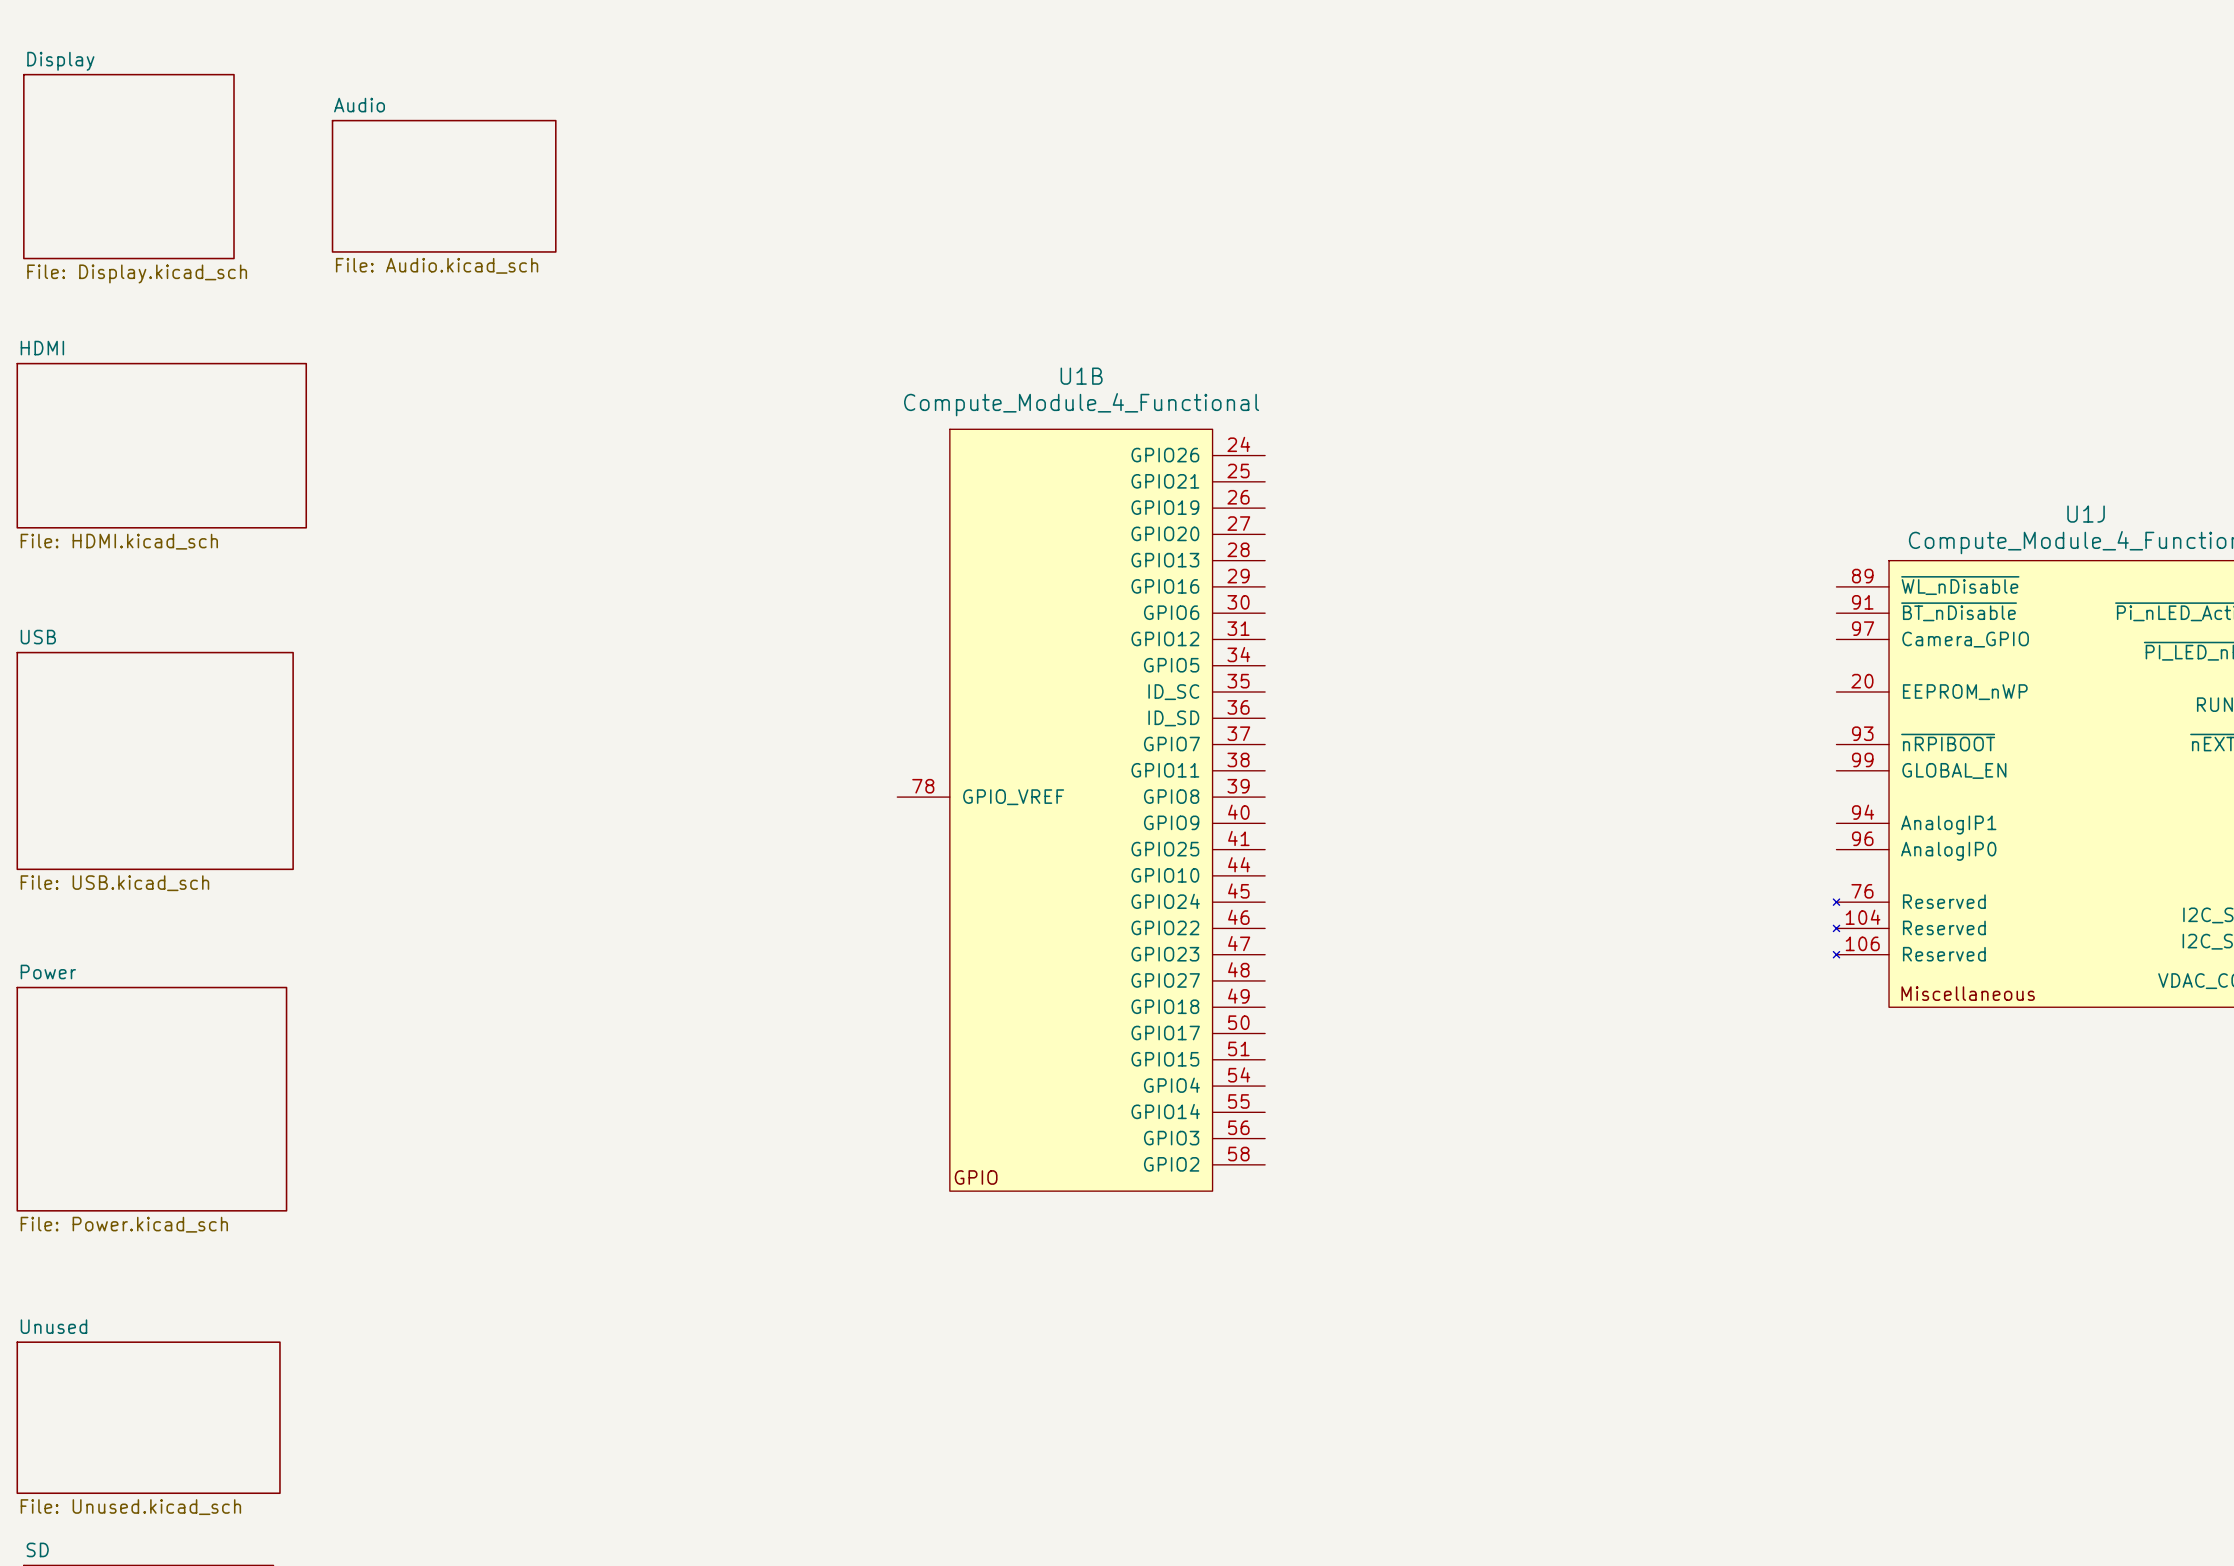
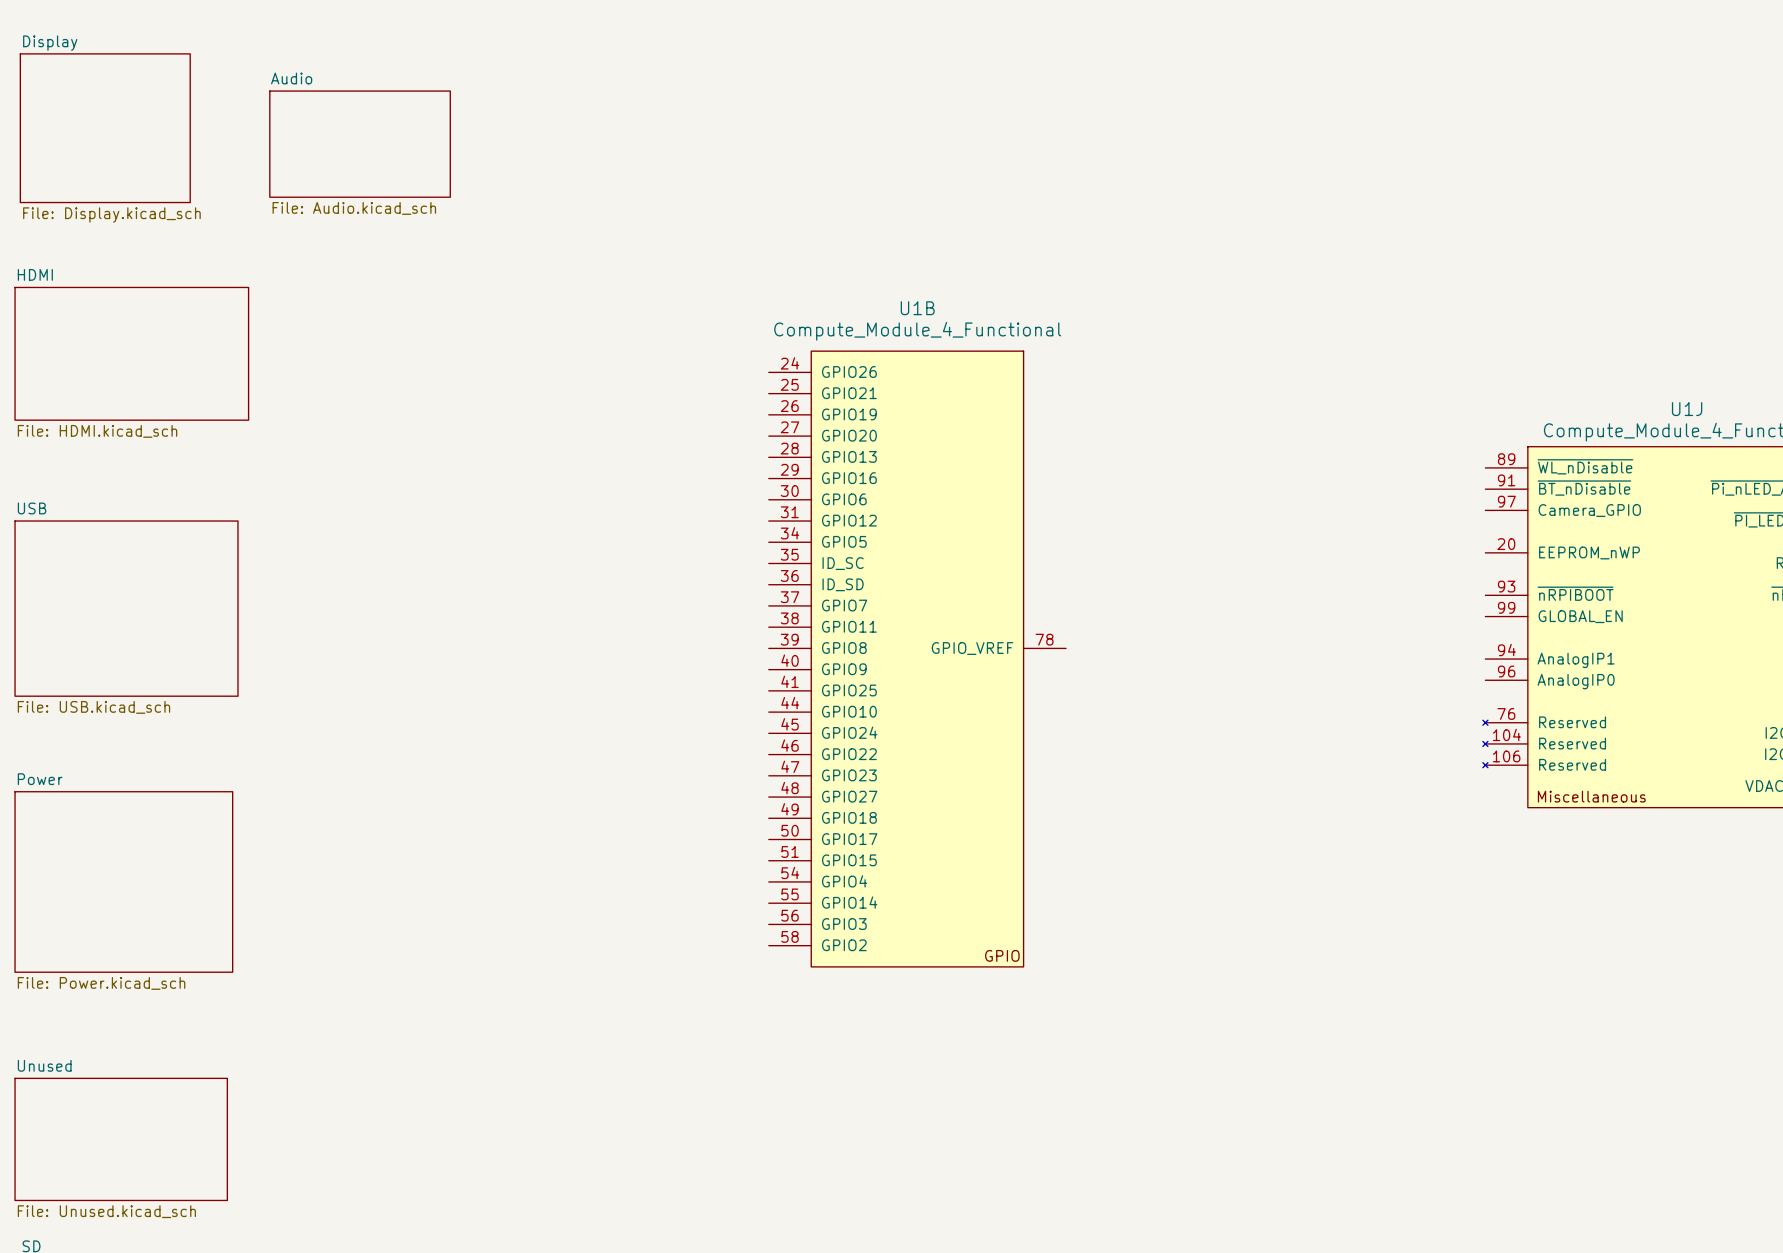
U1B flip: as is (1081, 810) -> left-right (917, 659)

